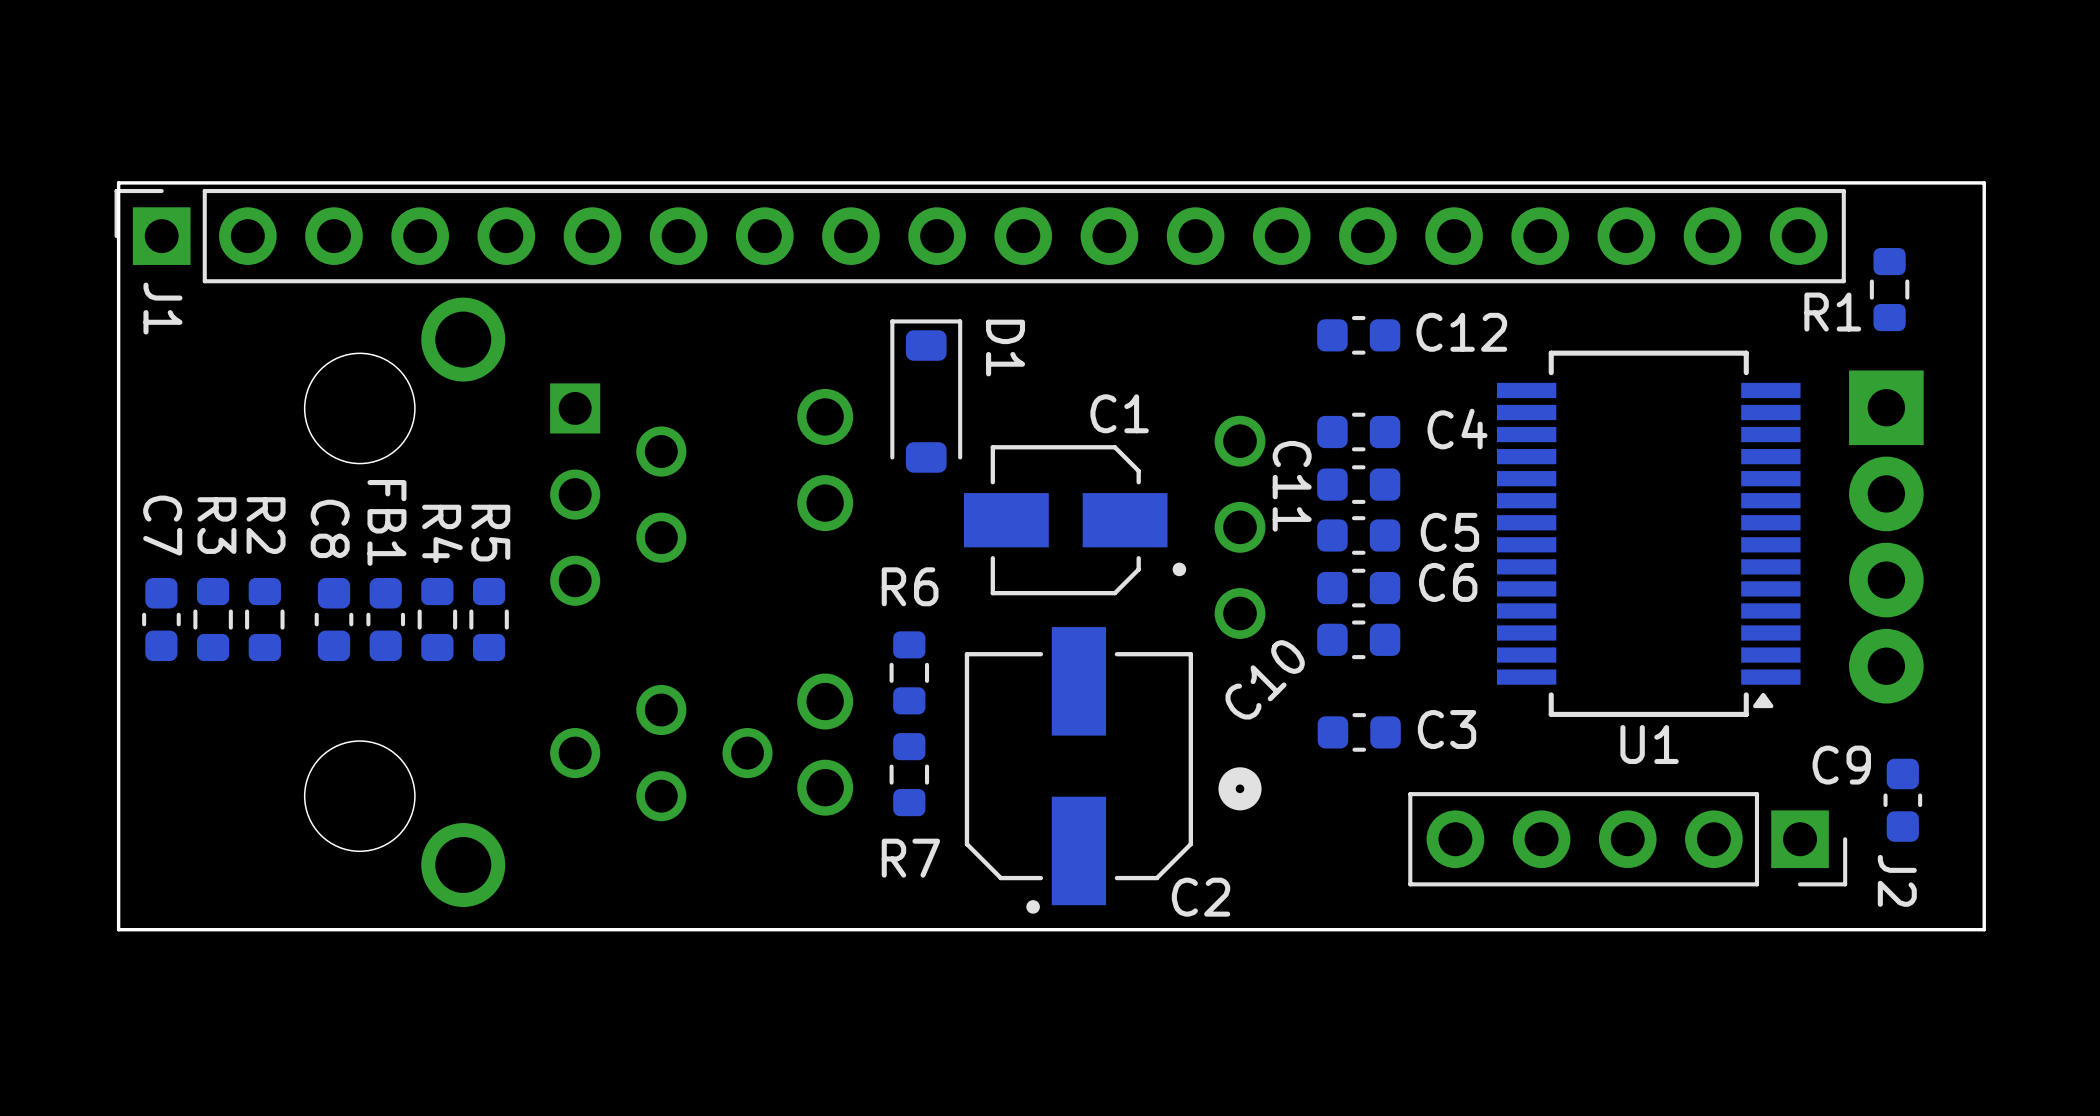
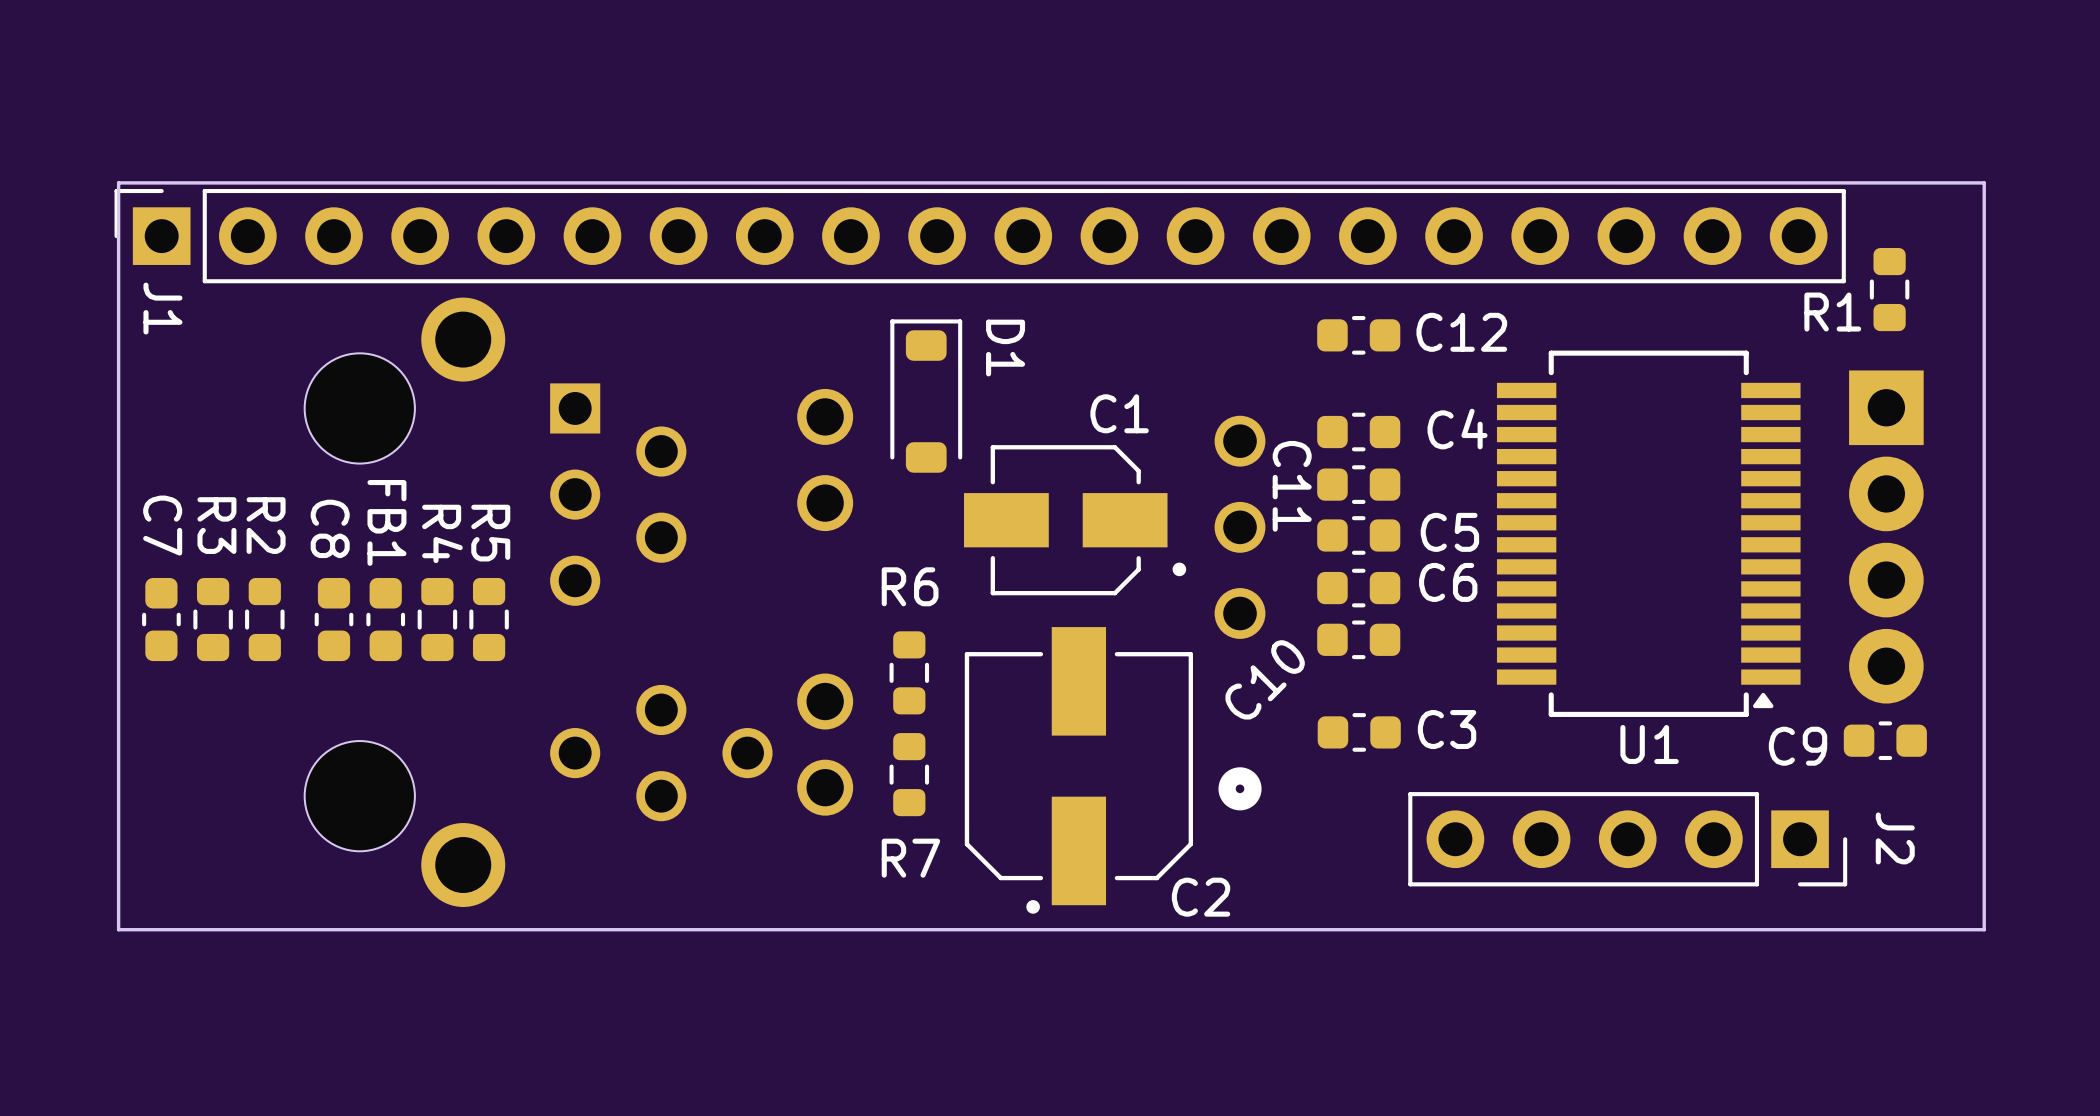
C9 rotation: 0° (1902, 800) -> 90° clockwise (1885, 740)
C9 position: (1902, 800) -> (1885, 740)
J2 name position: J2 (1897, 880) -> J2 (1895, 838)

